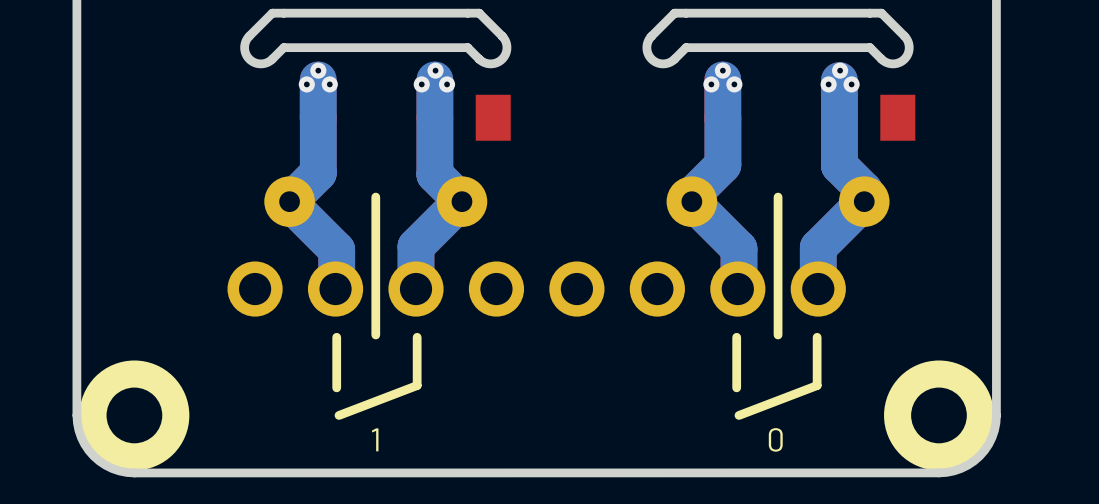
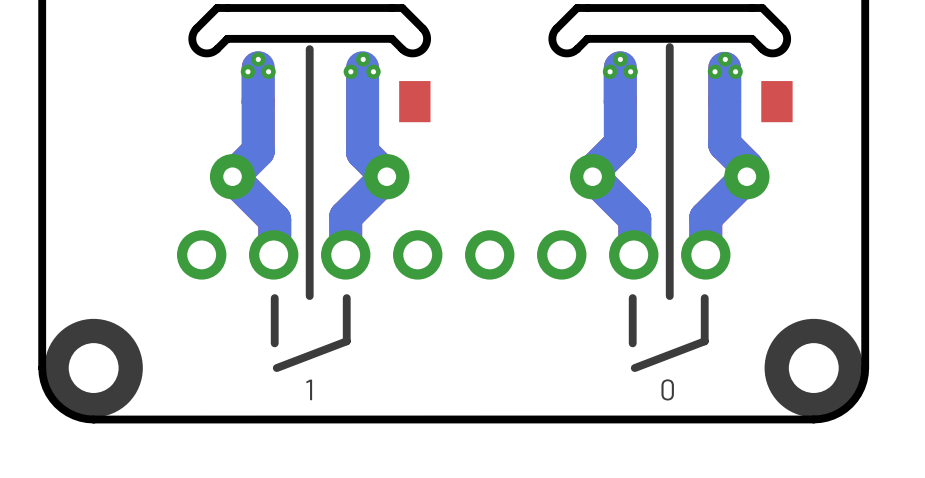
line: none -> (669, 47) (669, 172)
line: none -> (309, 49) (309, 172)

